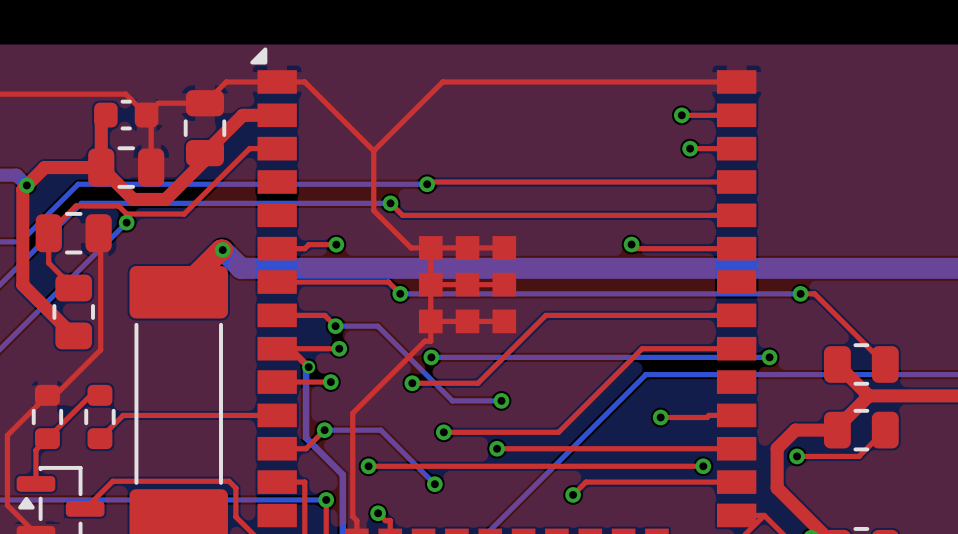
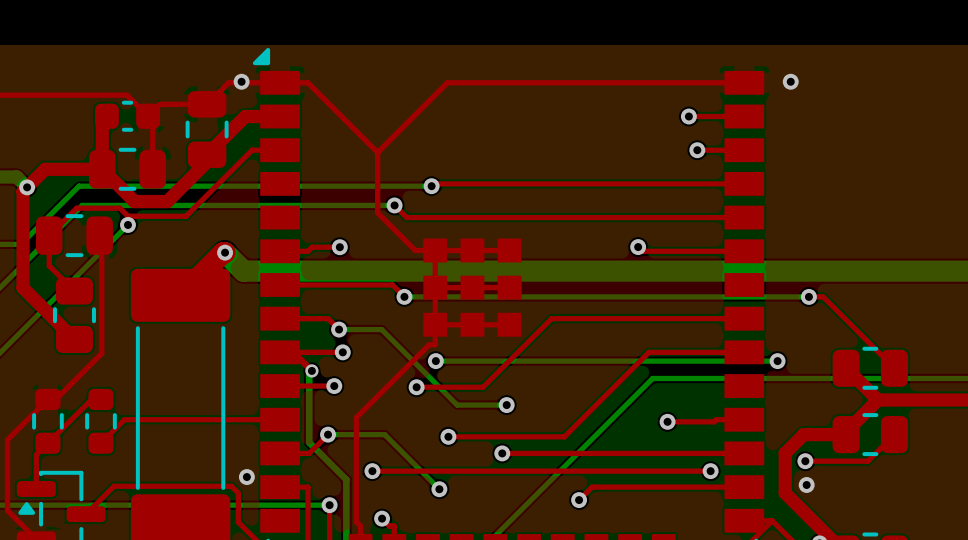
via: none -> (241, 81)
via: none -> (790, 81)
via: none -> (246, 477)
via: none -> (806, 485)

